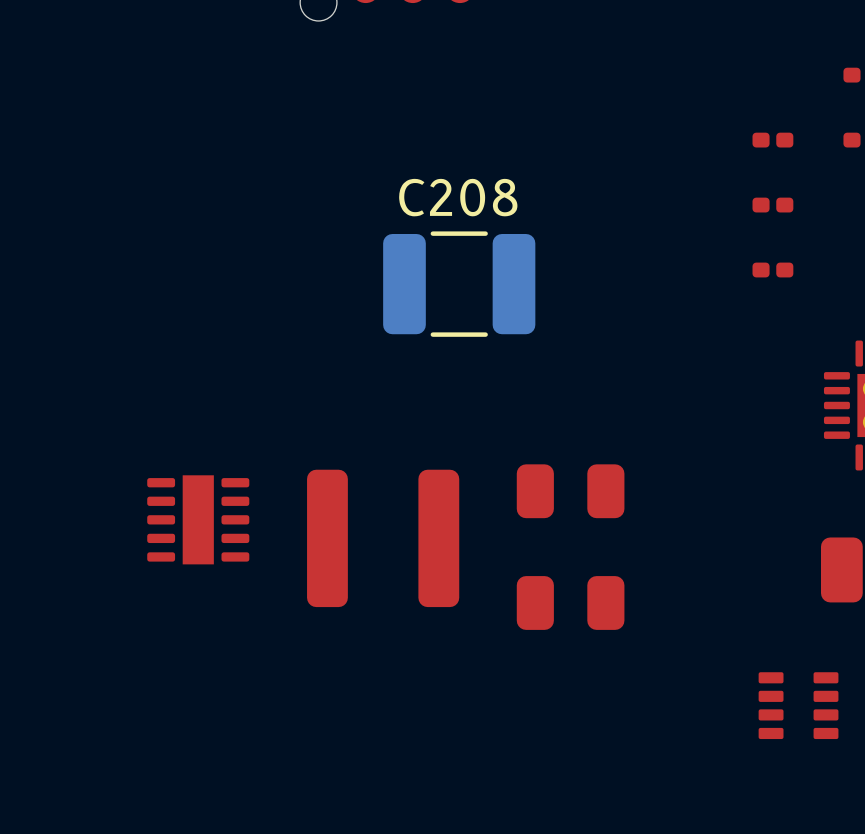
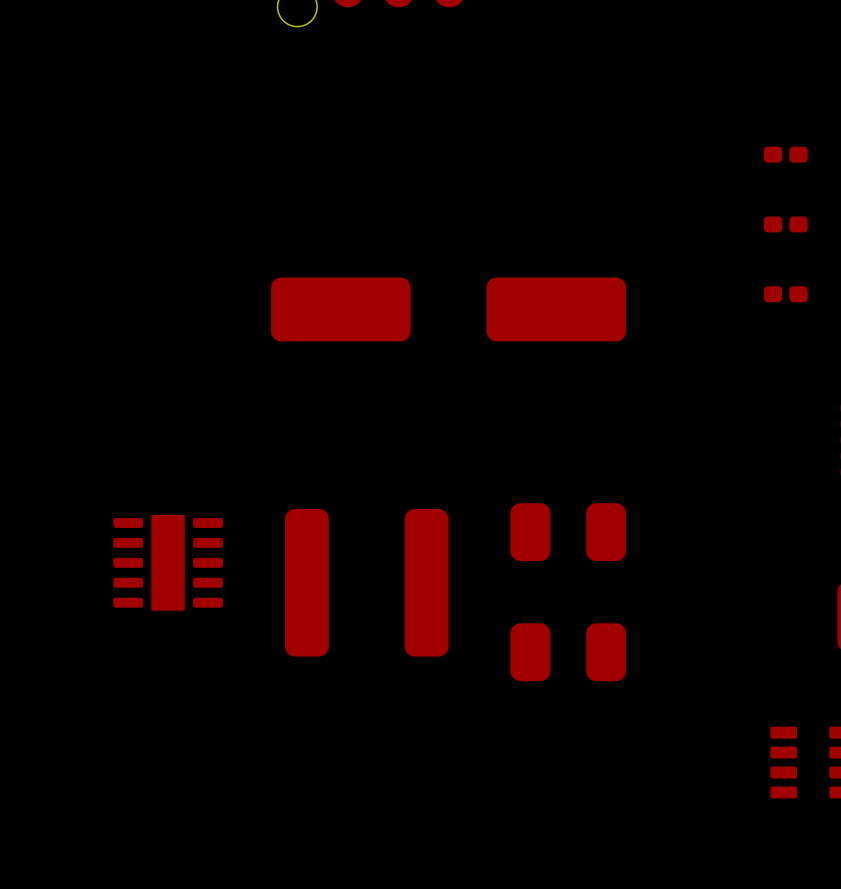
C208: (459, 284) -> none
part: none -> (448, 309)

